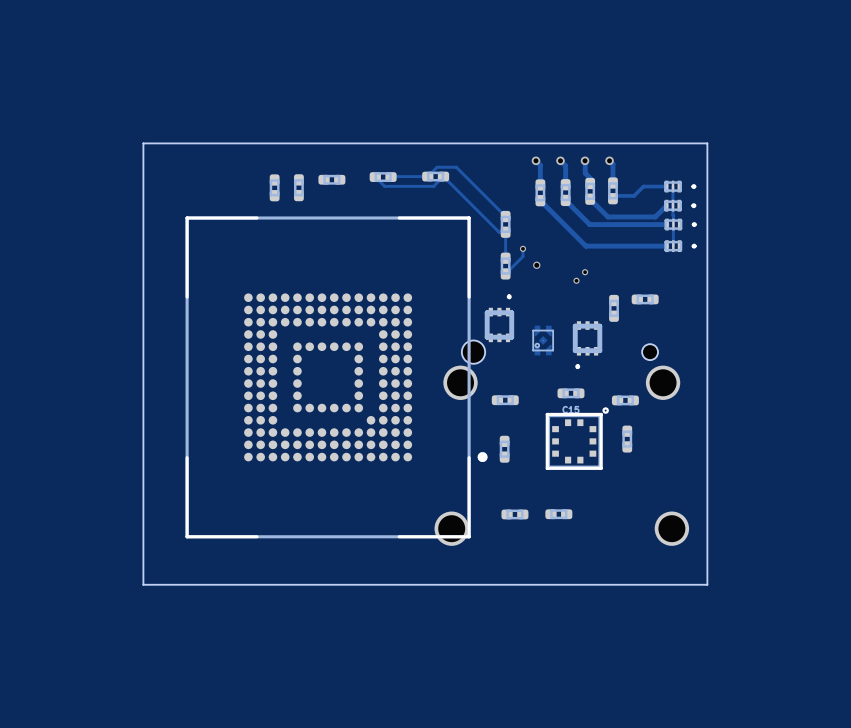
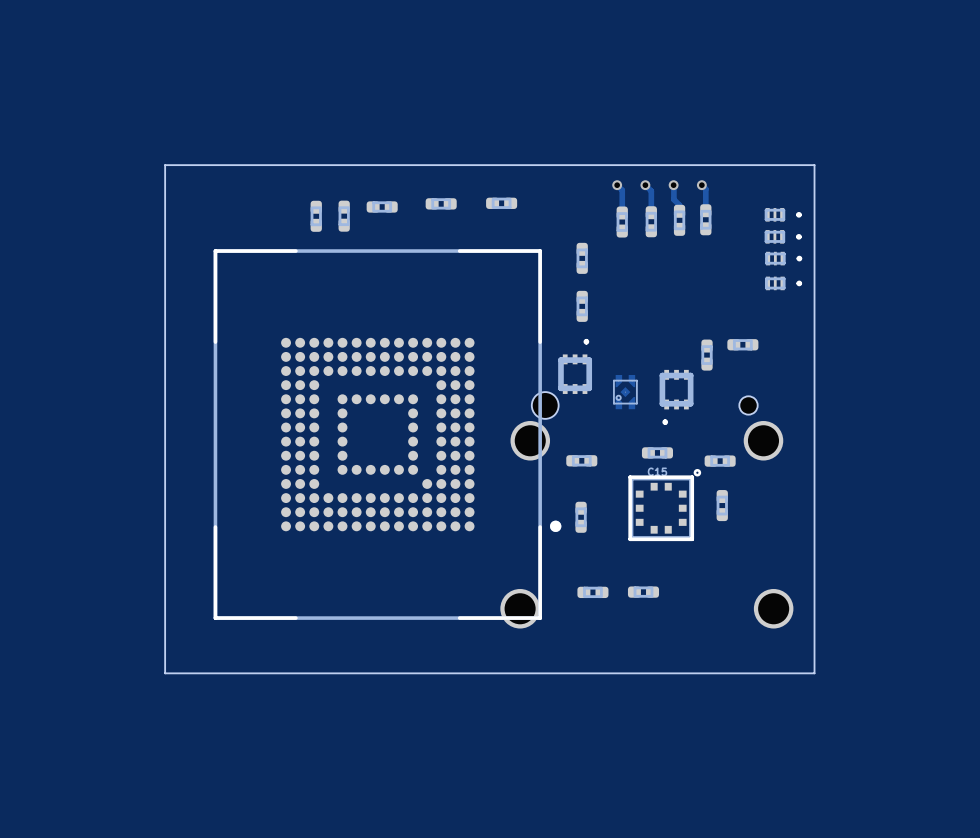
track: (375, 177) (384, 186) (433, 186) (443, 176) (499, 232) (505, 232) (505, 258) -> none
track: (391, 177) (427, 176) (437, 167) (456, 167) (505, 216) -> none
track: (666, 186) (643, 186) (634, 195) (615, 195) (612, 198) -> none
track: (672, 186) (673, 246) -> none
track: (590, 199) (607, 216) (655, 216) (666, 205) -> none
track: (540, 200) (585, 246) (666, 246) -> none
track: (565, 200) (589, 224) (667, 224) -> none
track: (522, 248) (522, 256) (505, 273) -> none
via: (522, 248) -> none
via: (536, 265) -> none
via: (585, 272) -> none
via: (576, 280) -> none

